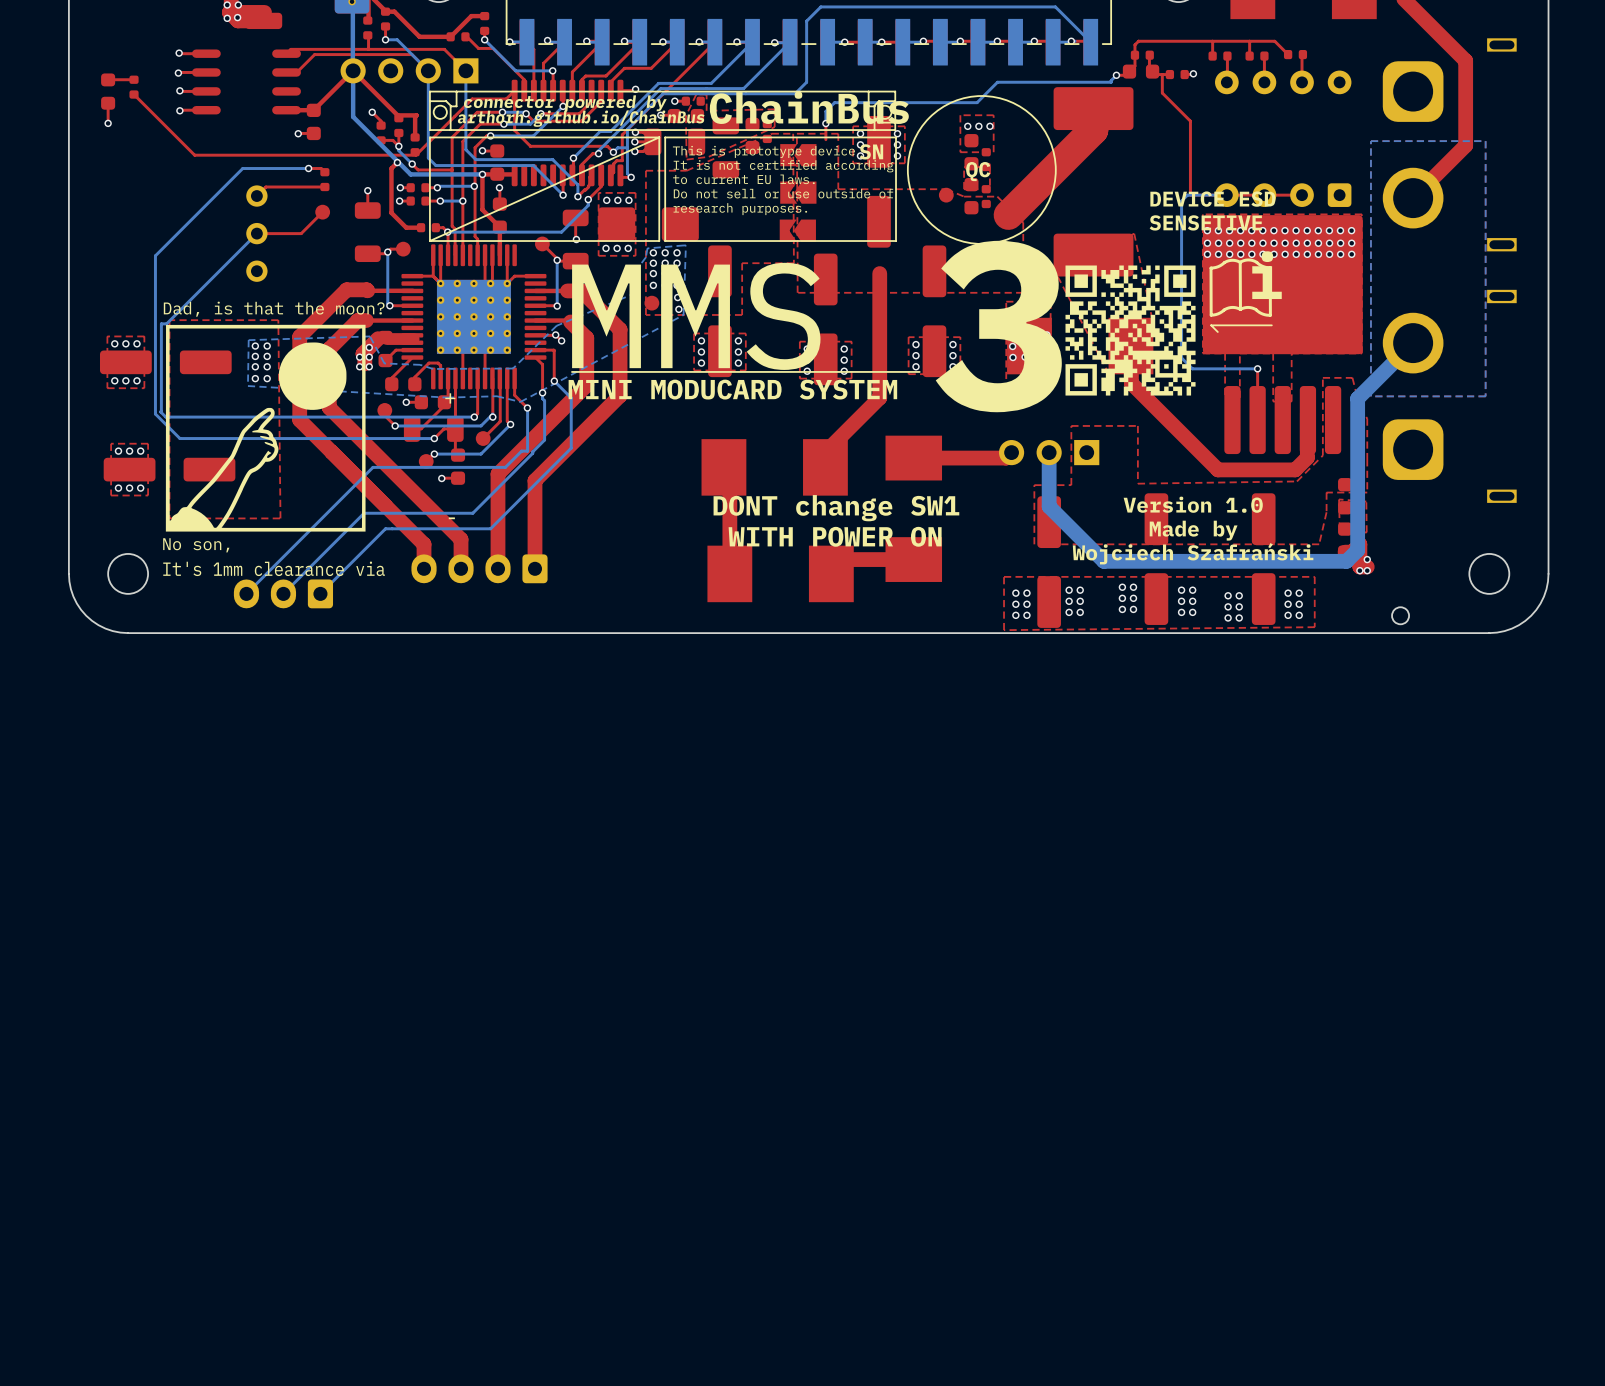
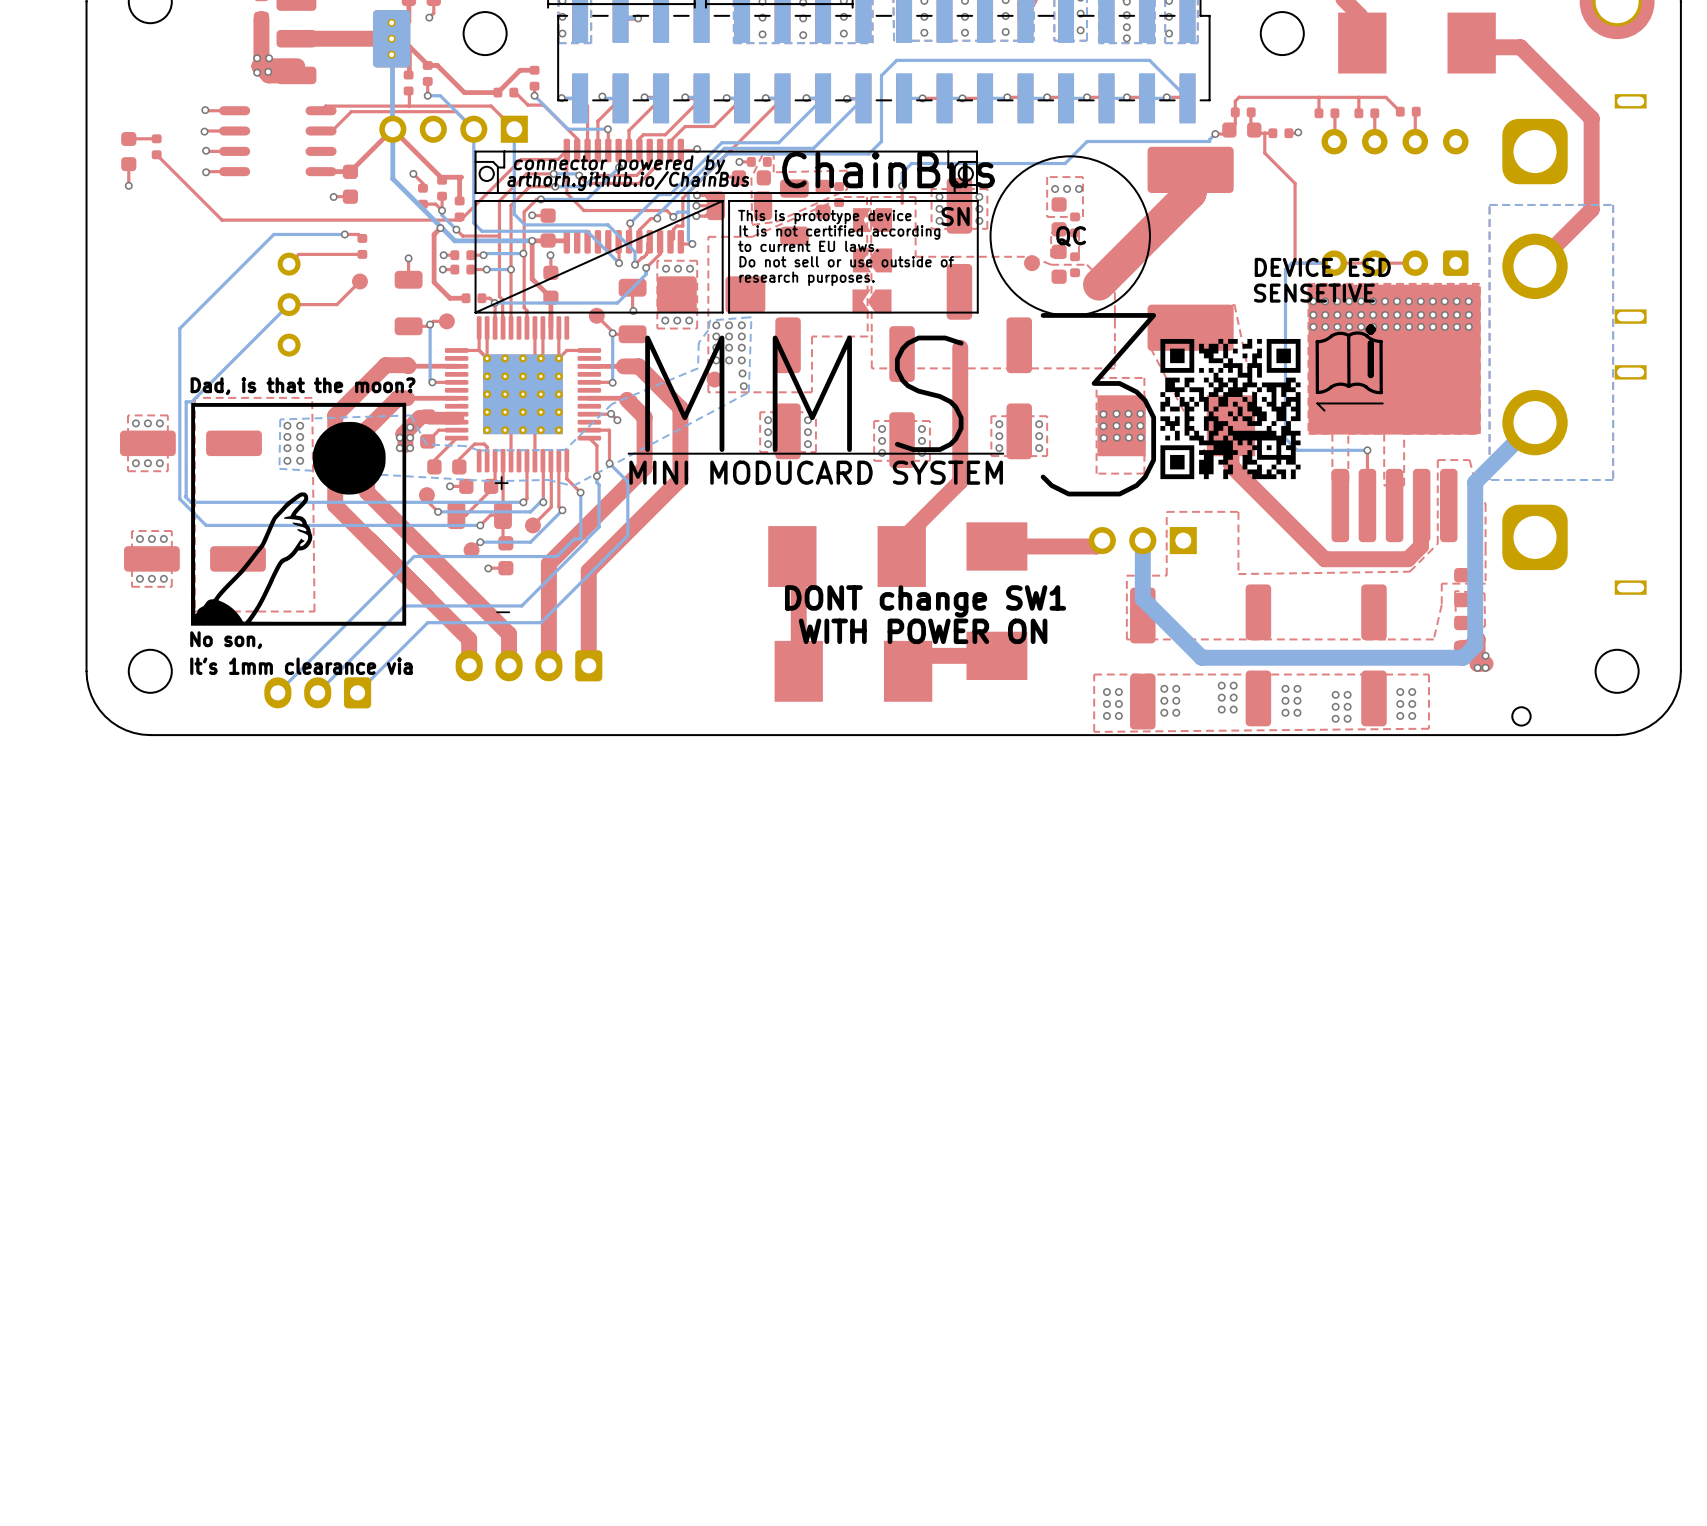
text: Version 1.0 (1193, 504) -> none
text: Made by (1193, 530) -> none
text: Wojciech Szafrański (1193, 553) -> none

